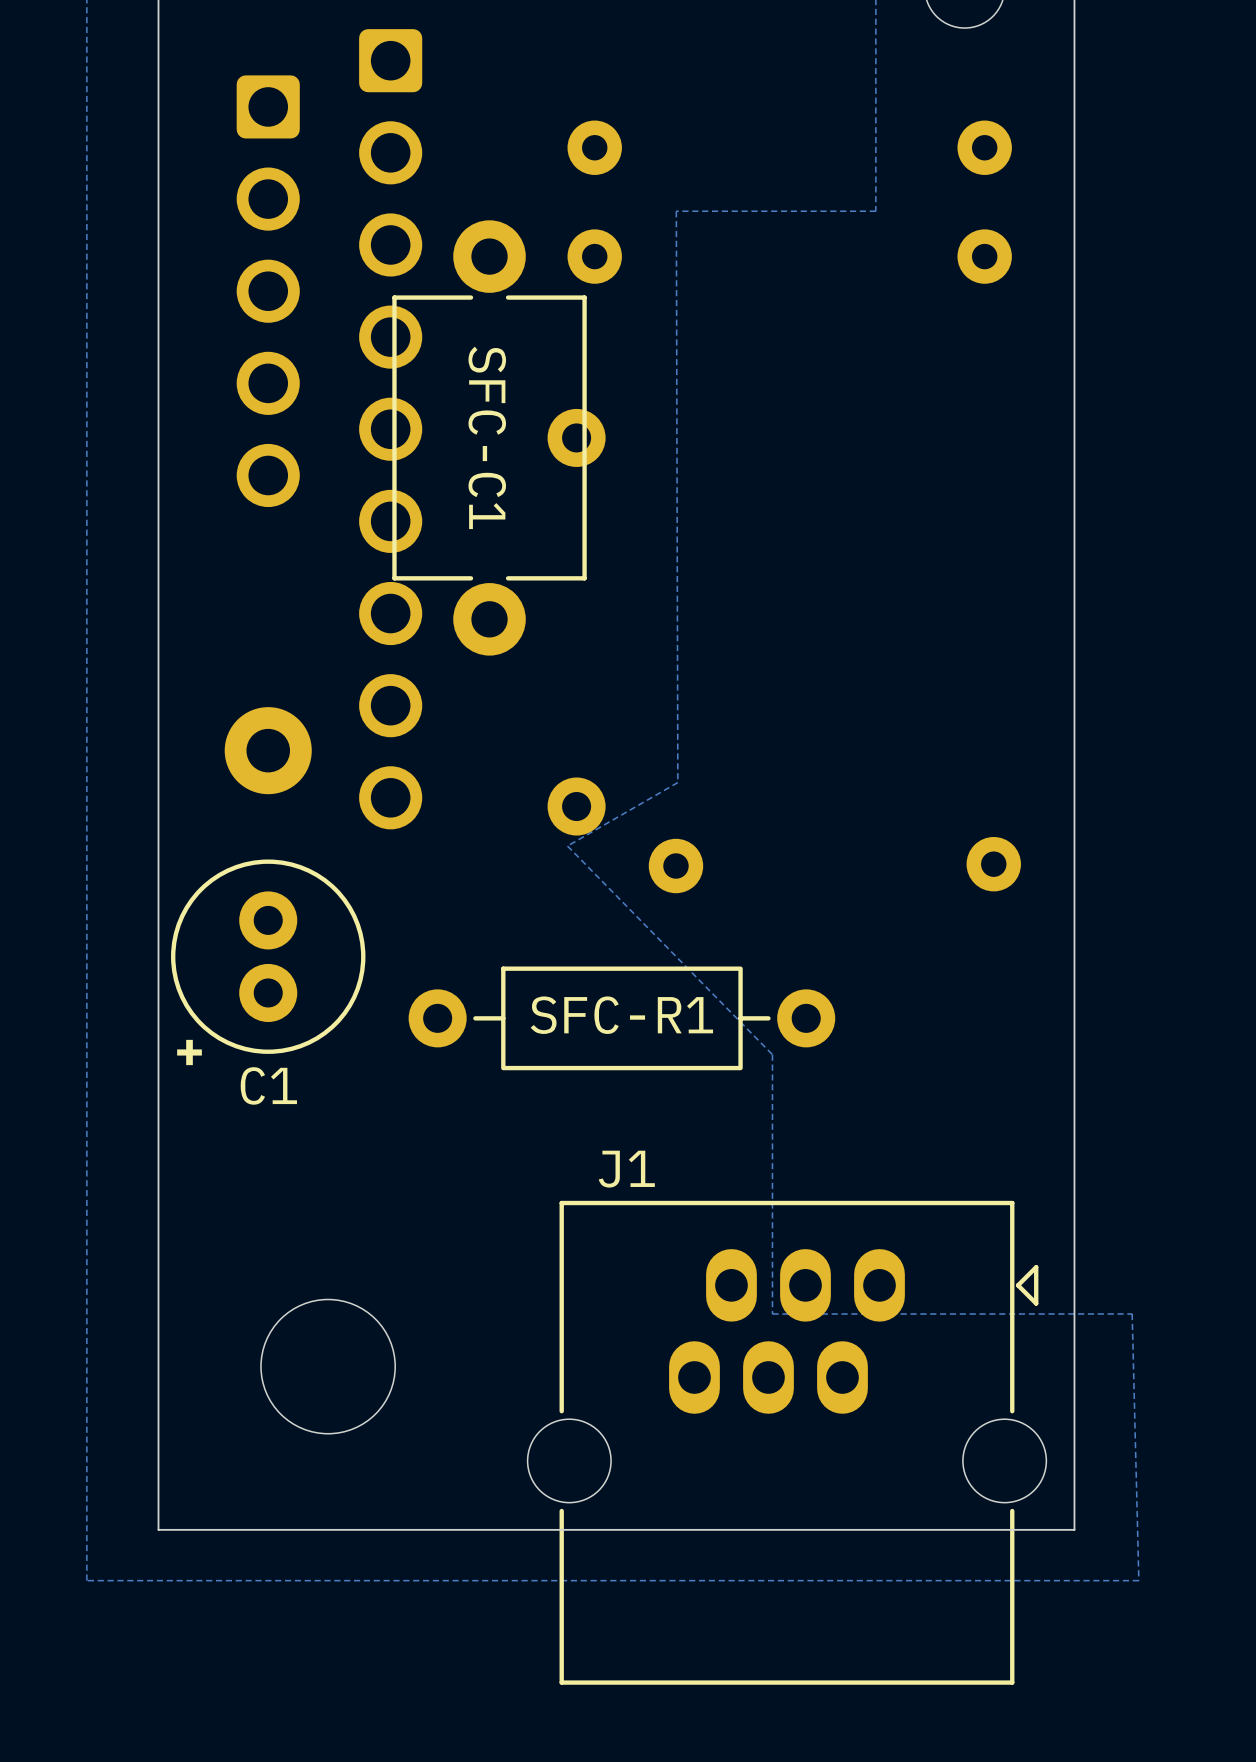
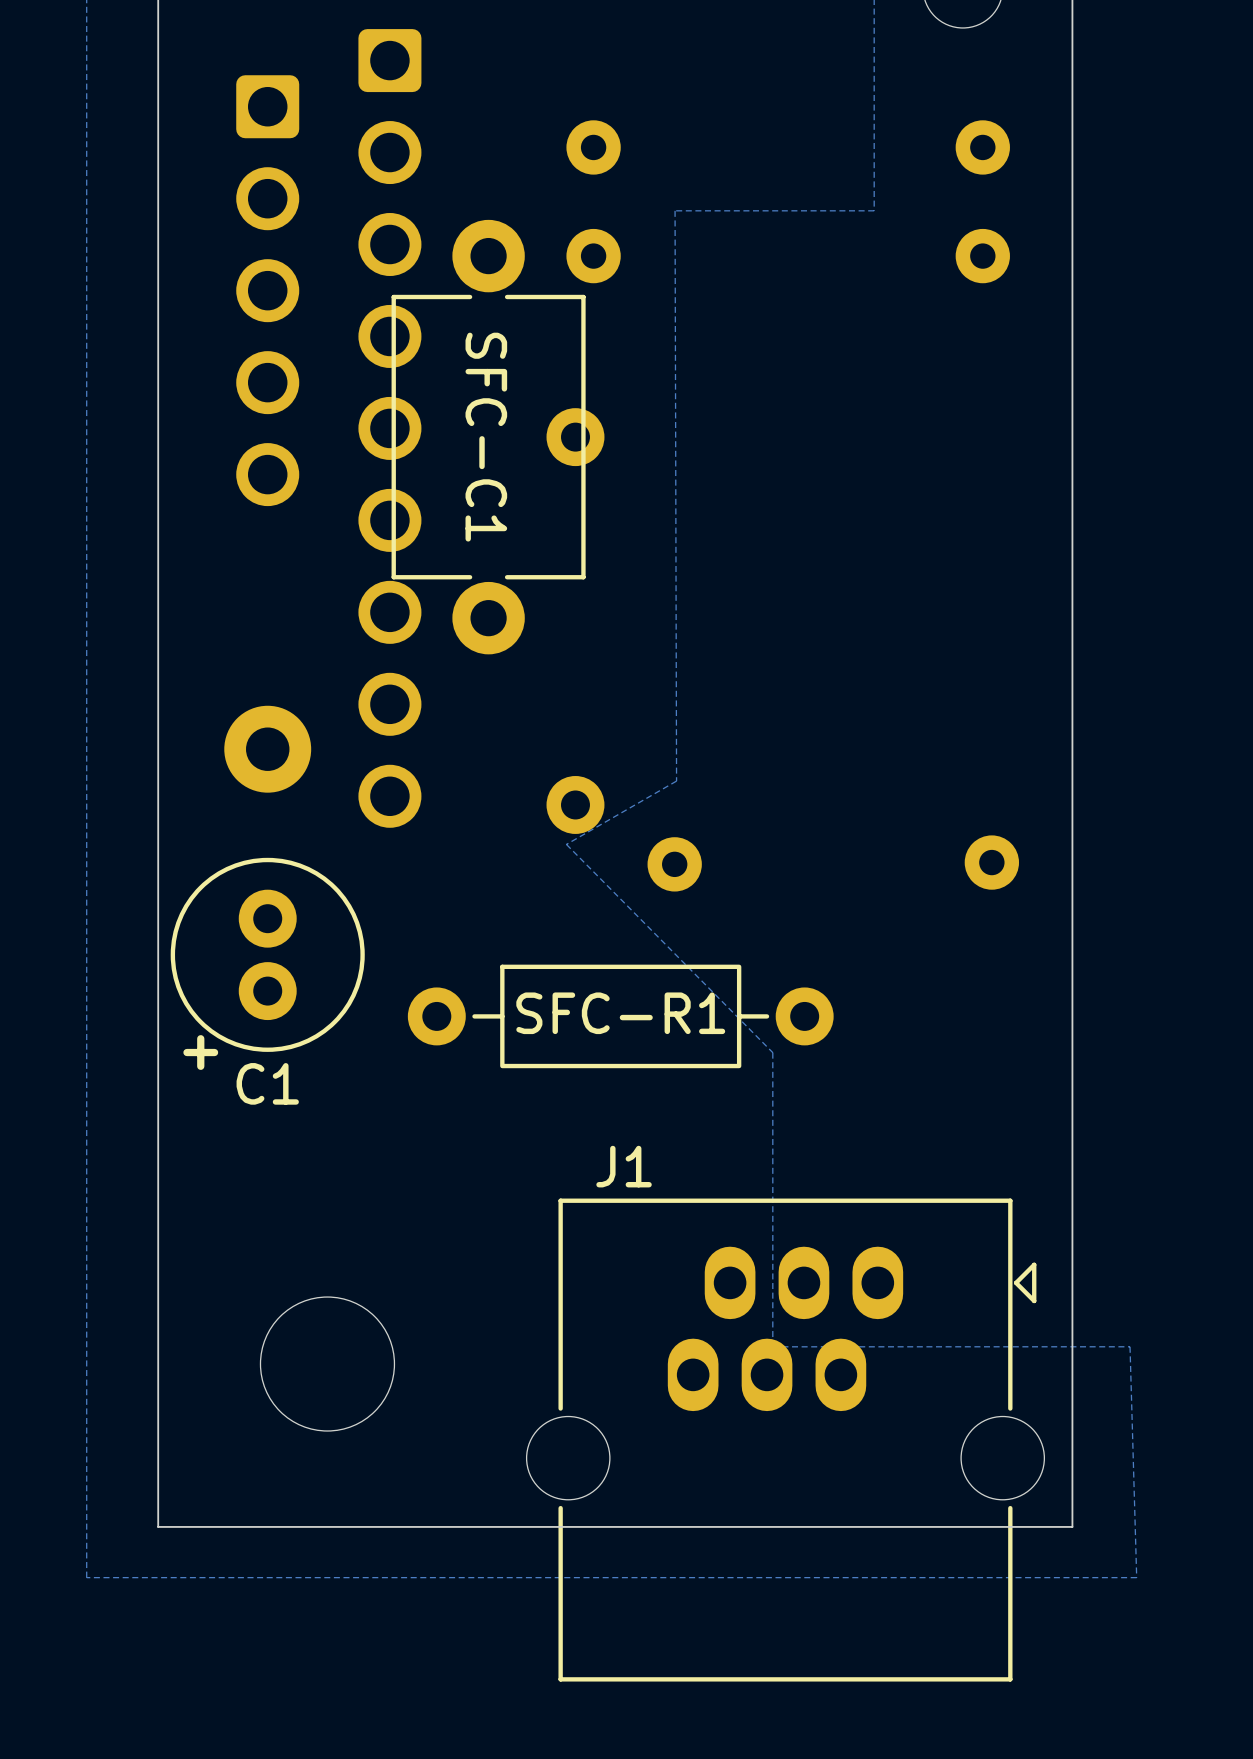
zone outline: (567, 846) (772, 1054) (772, 1314) (1132, 1313) (1138, 1580) -> (566, 844) (772, 1052) (772, 1346) (1130, 1346) (1136, 1577)

